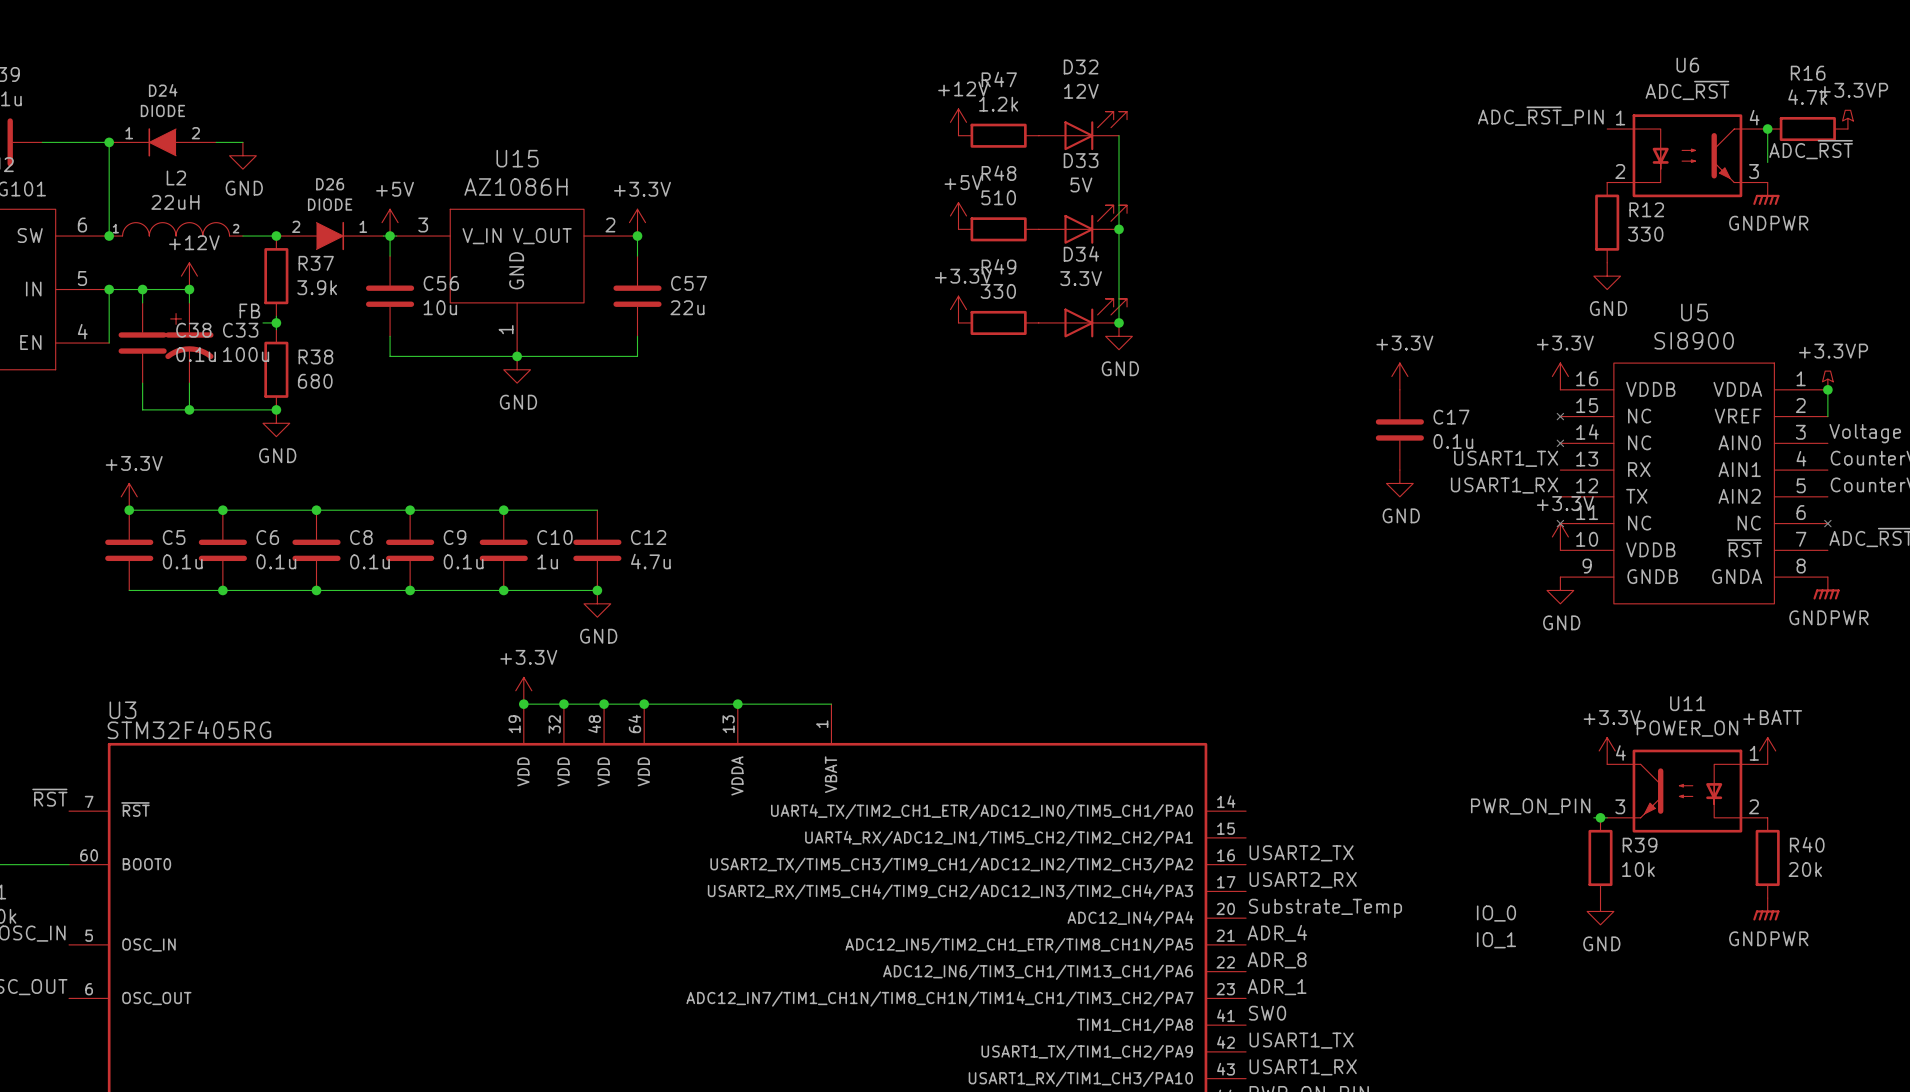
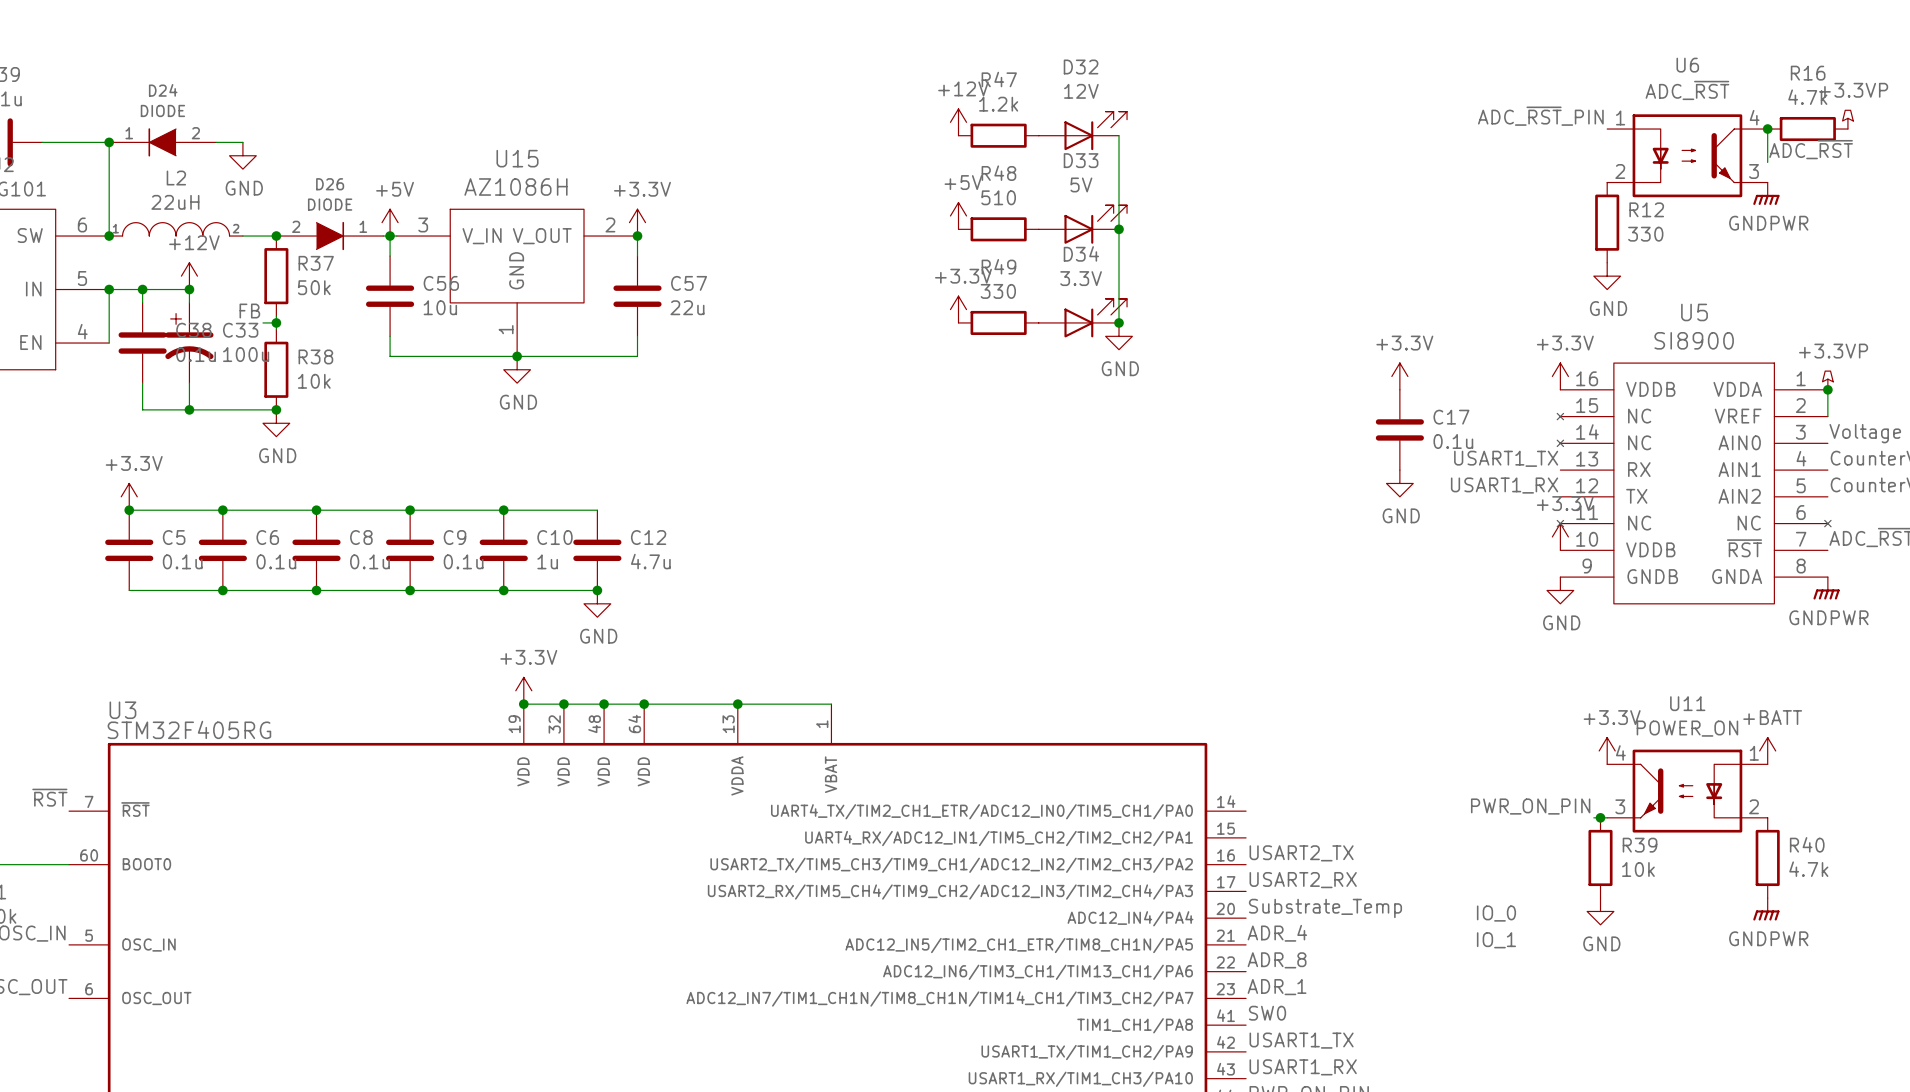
R37 value: 3.9k (317, 287) -> 50k (314, 287)
R38 value: 680 (315, 381) -> 10k (314, 381)
R40 value: 20k (1805, 869) -> 4.7k (1808, 869)

